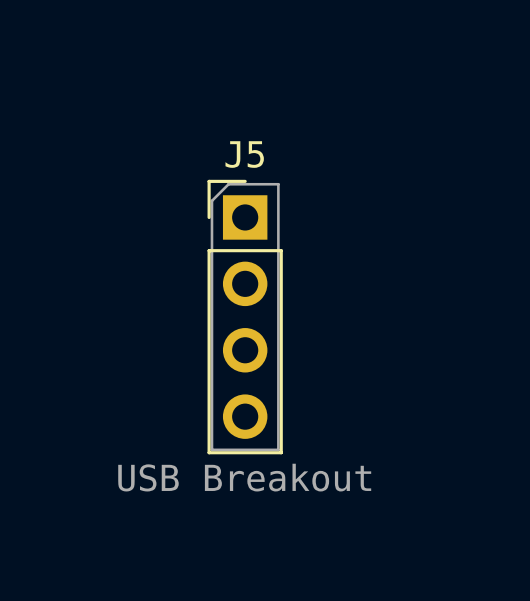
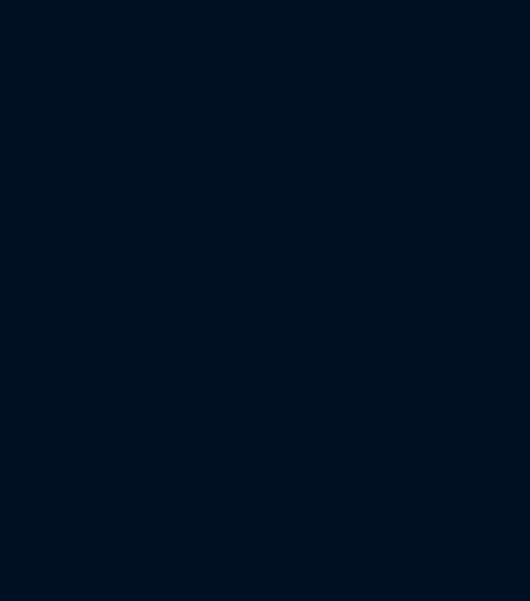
J5: USB Breakout (245, 317) -> none

